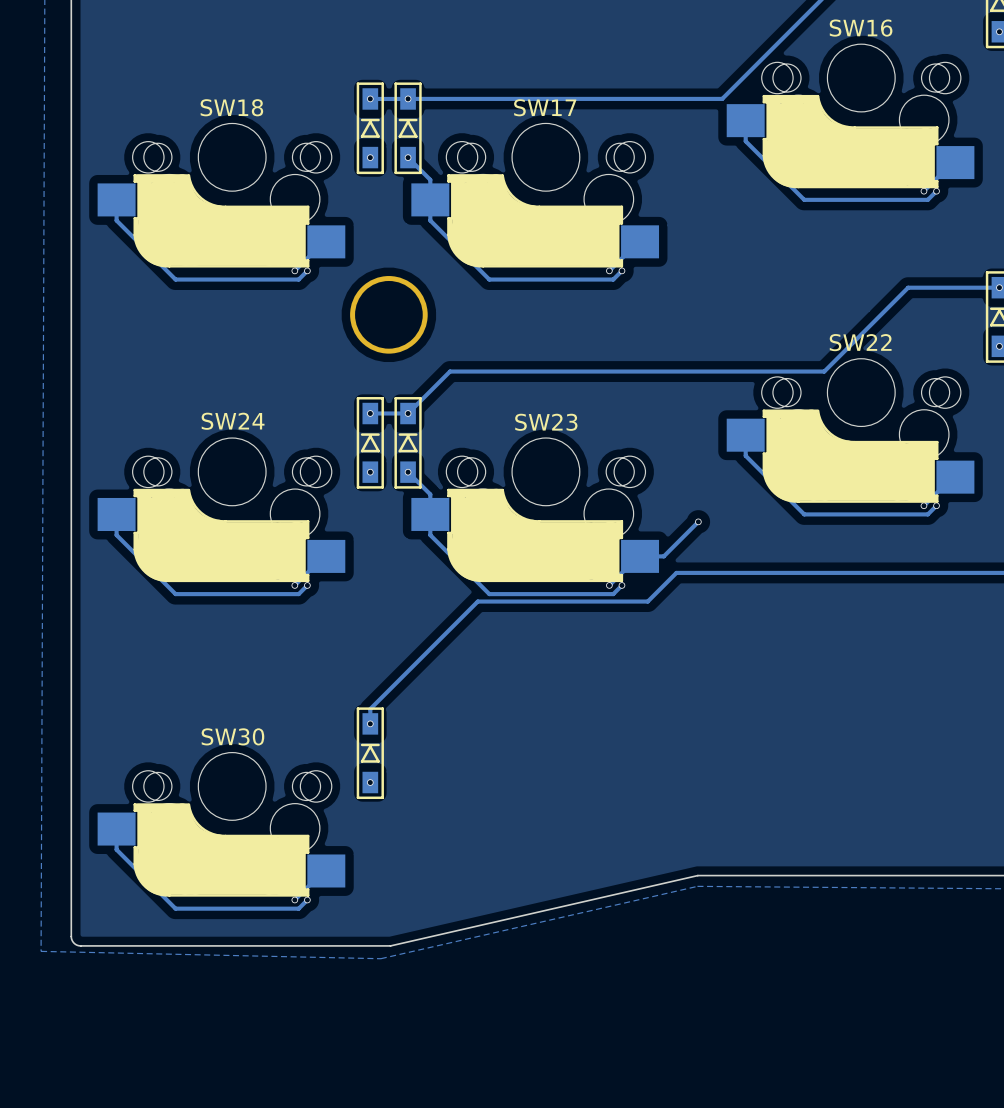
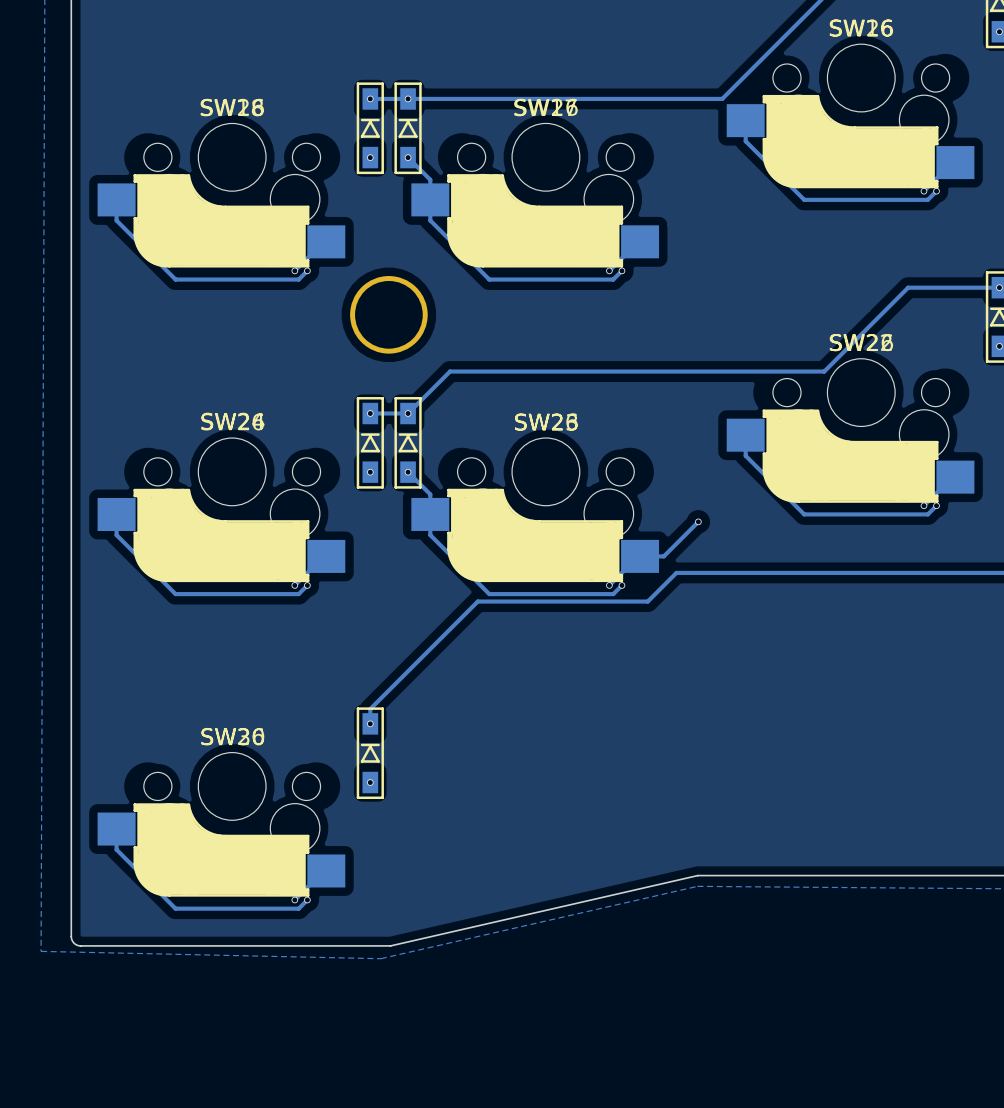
part footprint: [726, 44, 975, 189] -> [726, 44, 975, 189]
part footprint: [97, 123, 346, 268] -> [97, 123, 346, 268]
part footprint: [411, 123, 660, 268] -> [411, 123, 660, 268]
part footprint: [726, 358, 975, 503] -> [726, 358, 975, 503]
part footprint: [97, 438, 346, 583] -> [97, 438, 346, 583]
part footprint: [411, 438, 660, 583] -> [411, 438, 660, 583]
part footprint: [97, 752, 346, 897] -> [97, 752, 346, 897]

